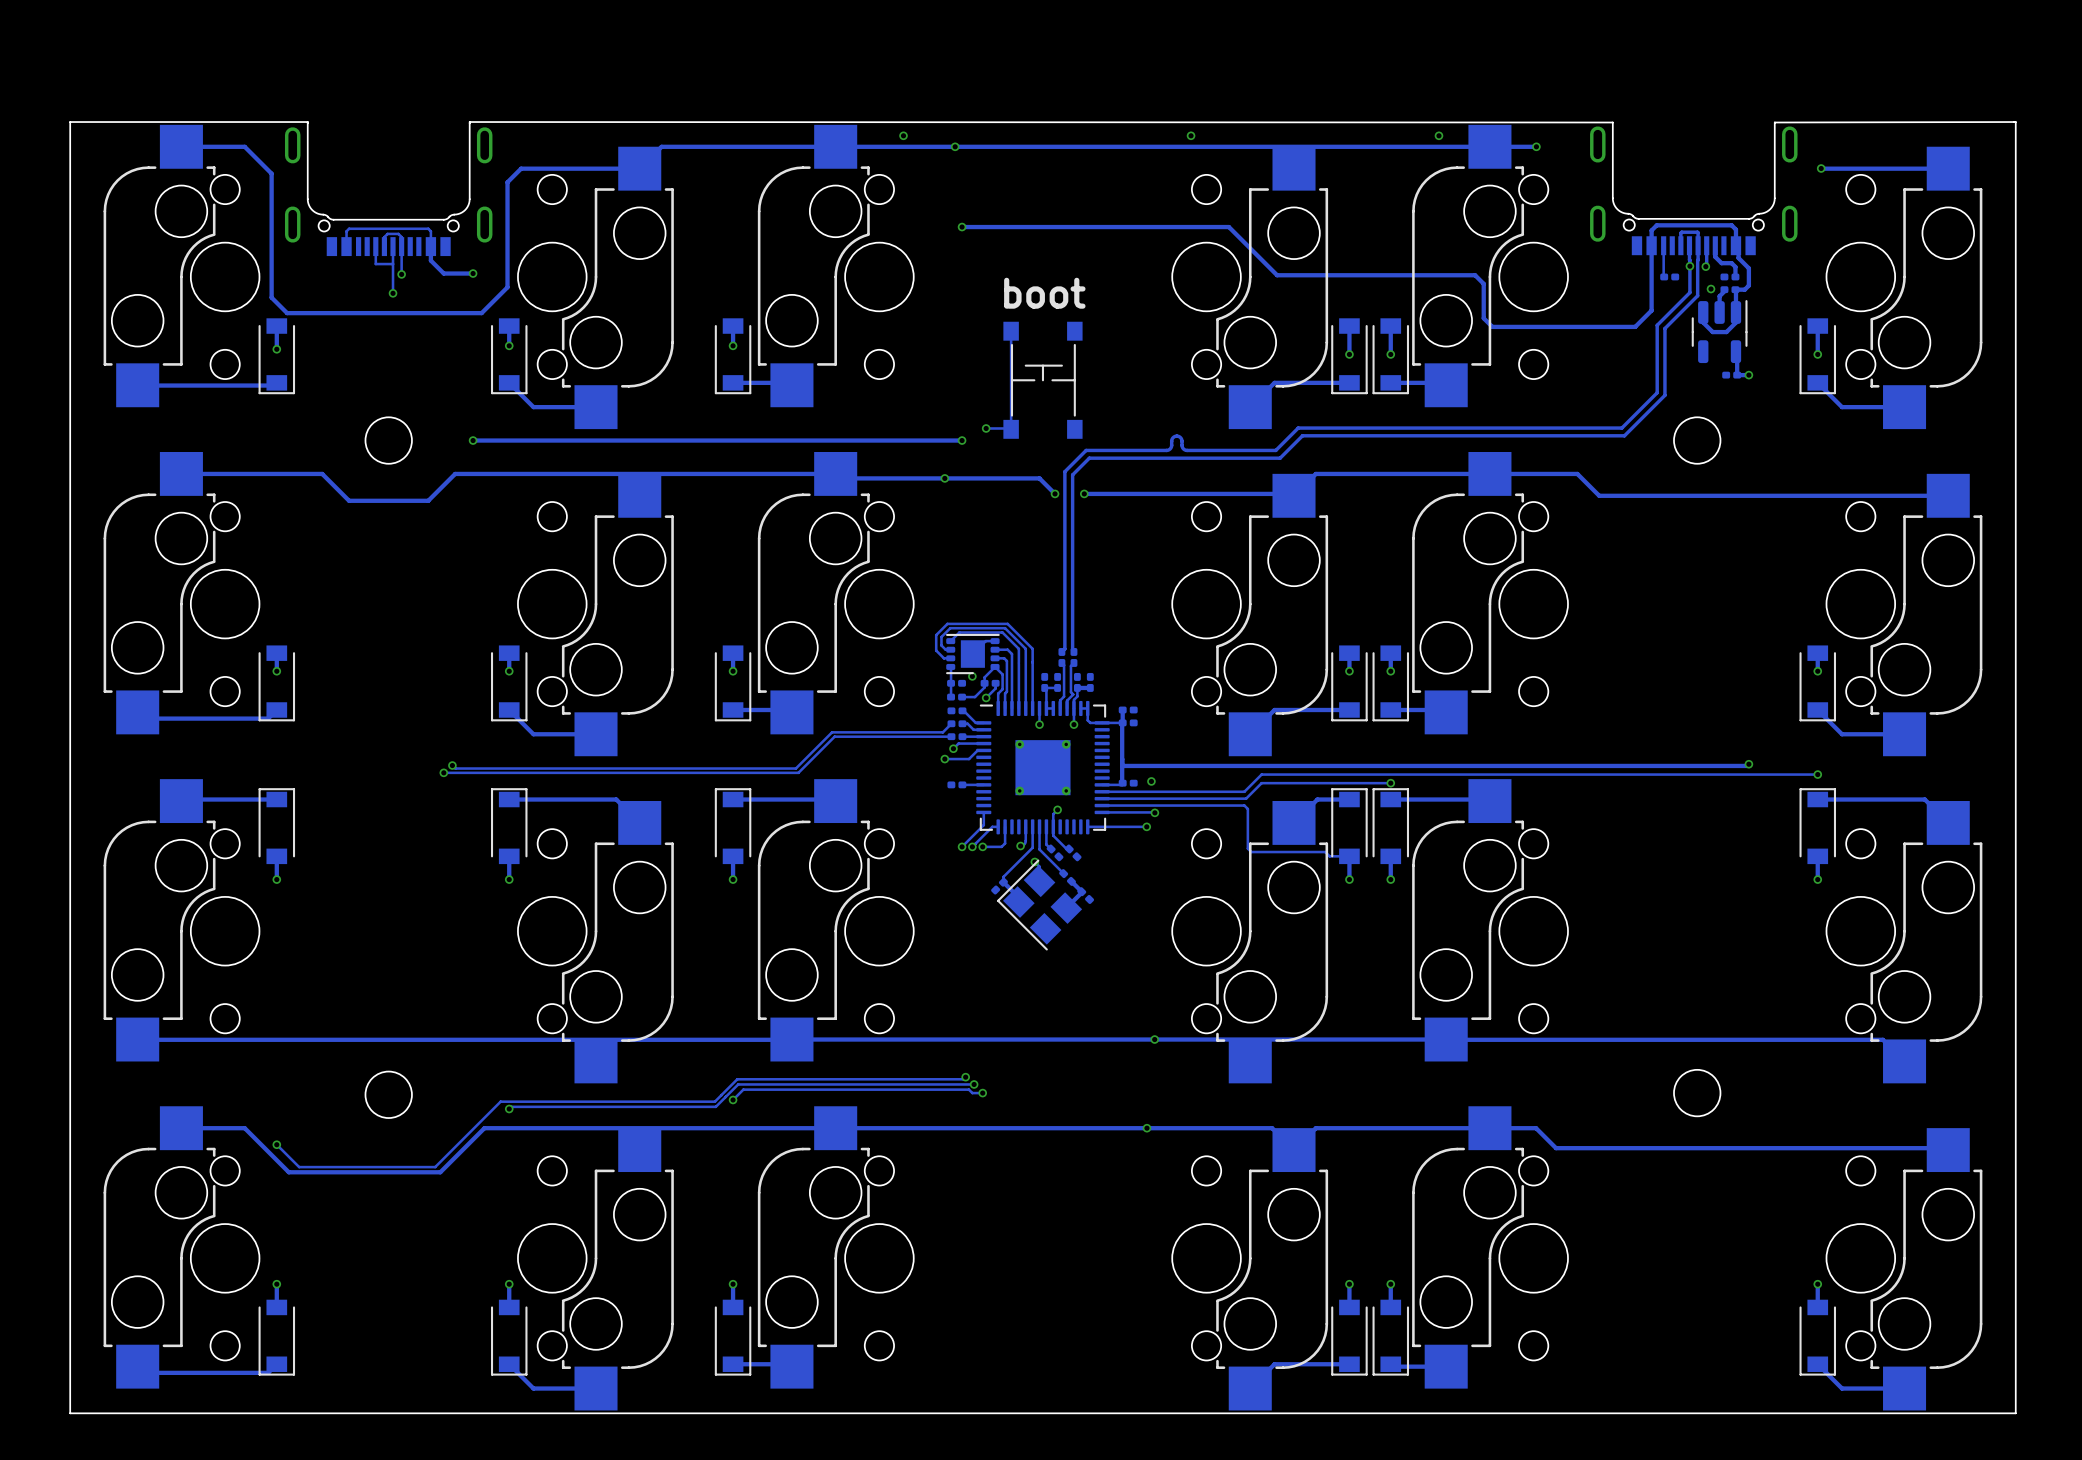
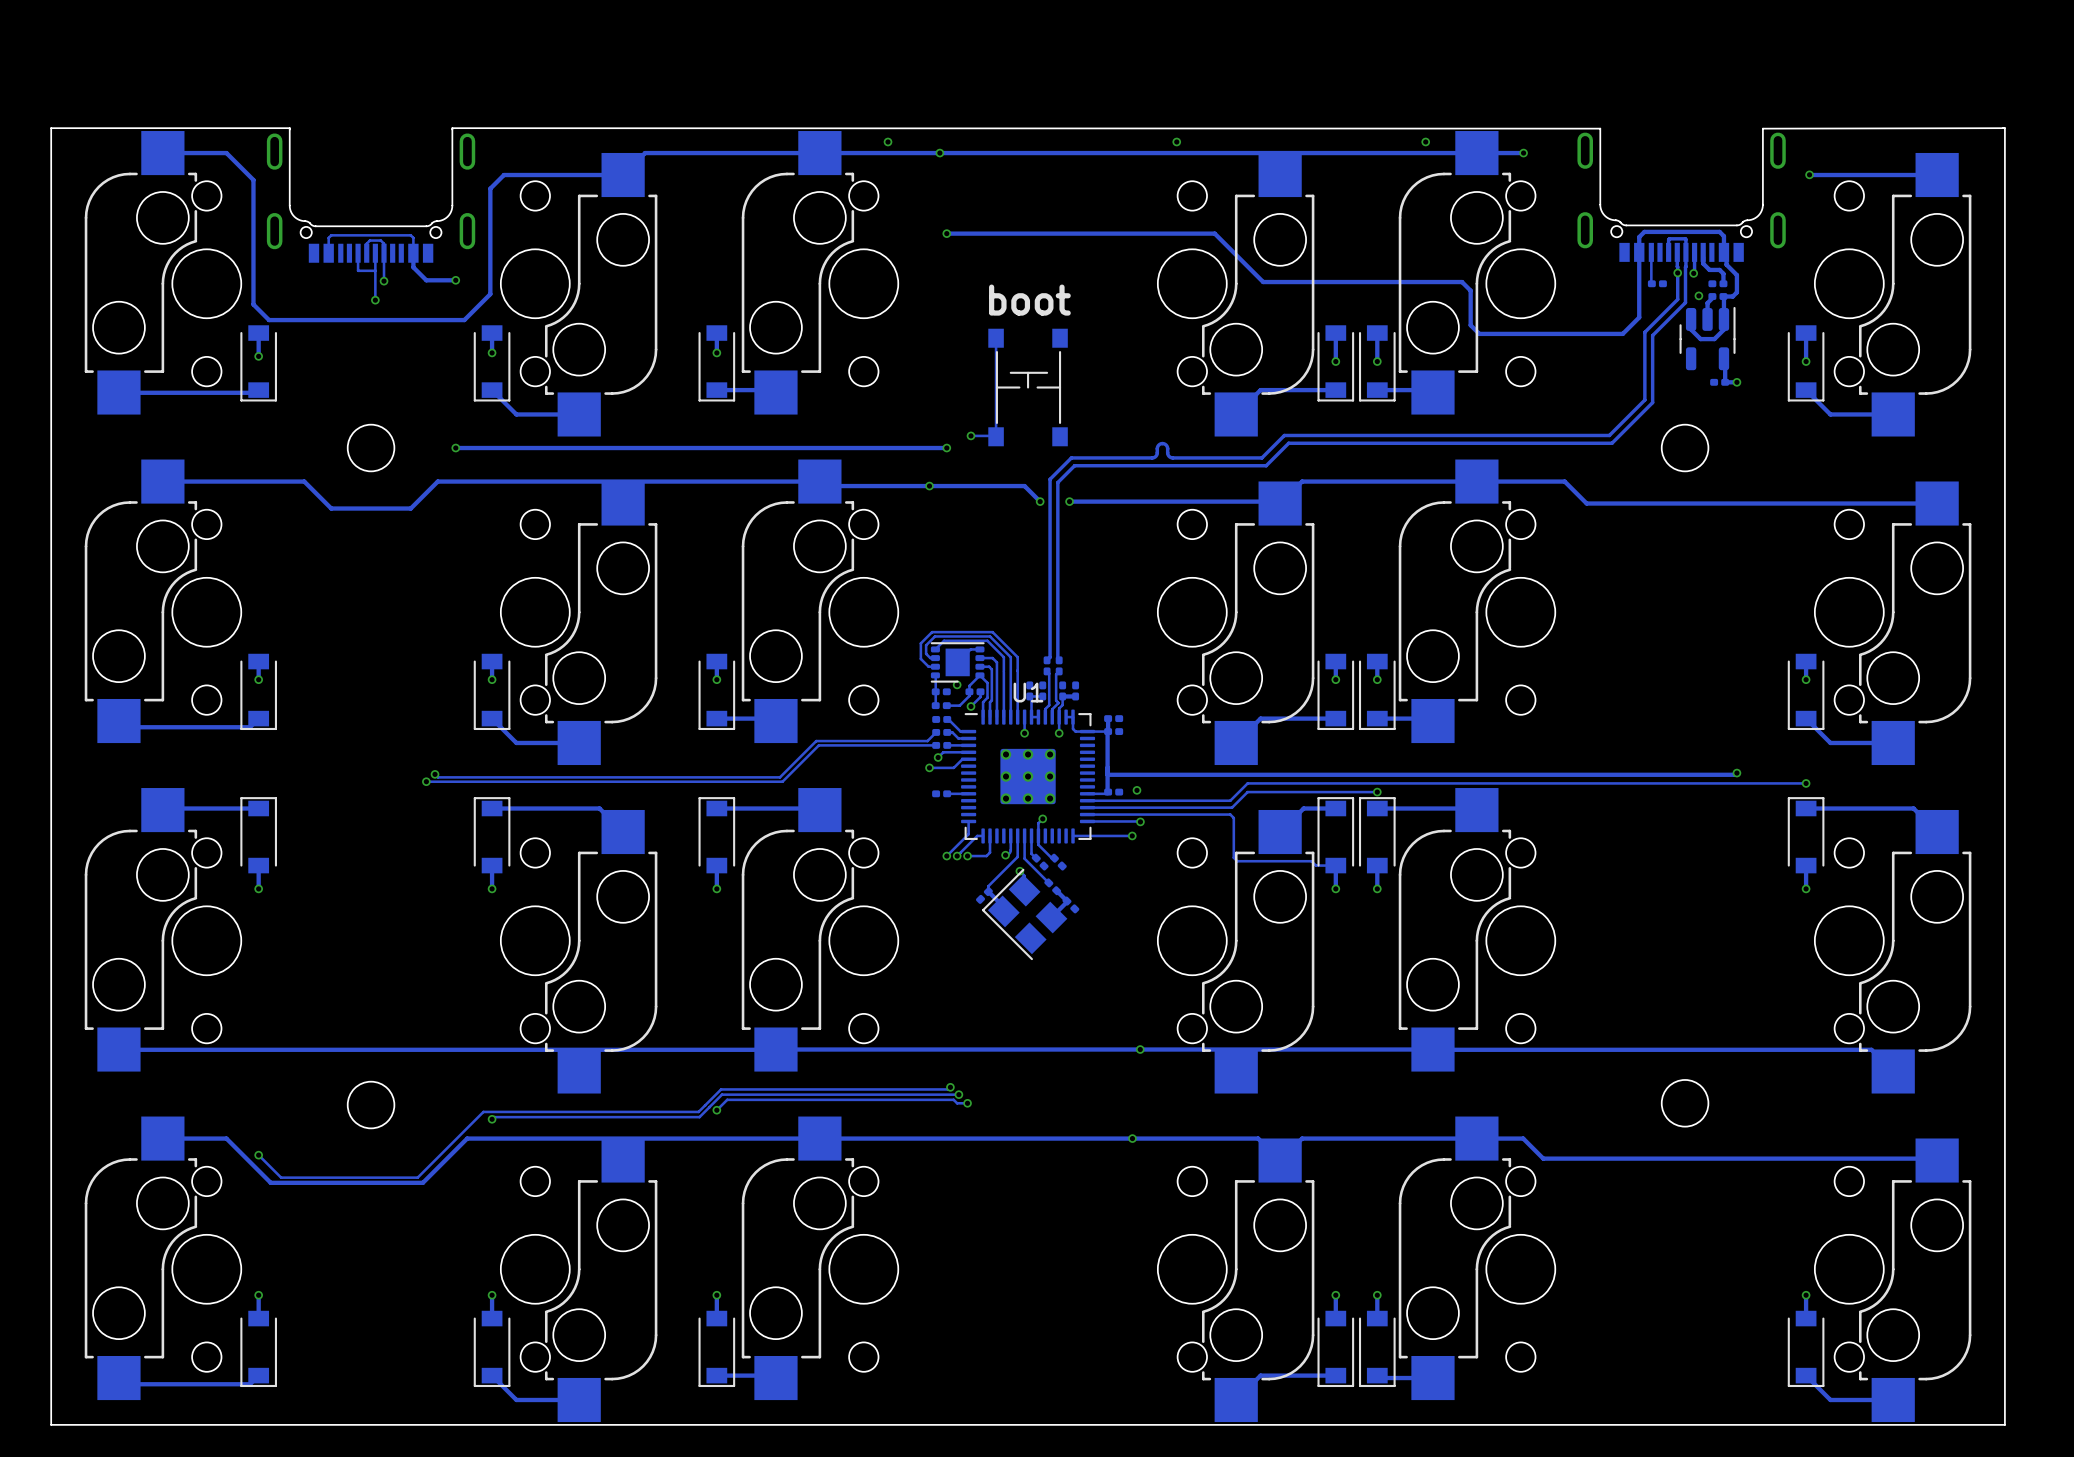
part: (1042, 767) -> none
U1: none -> (1028, 776)

